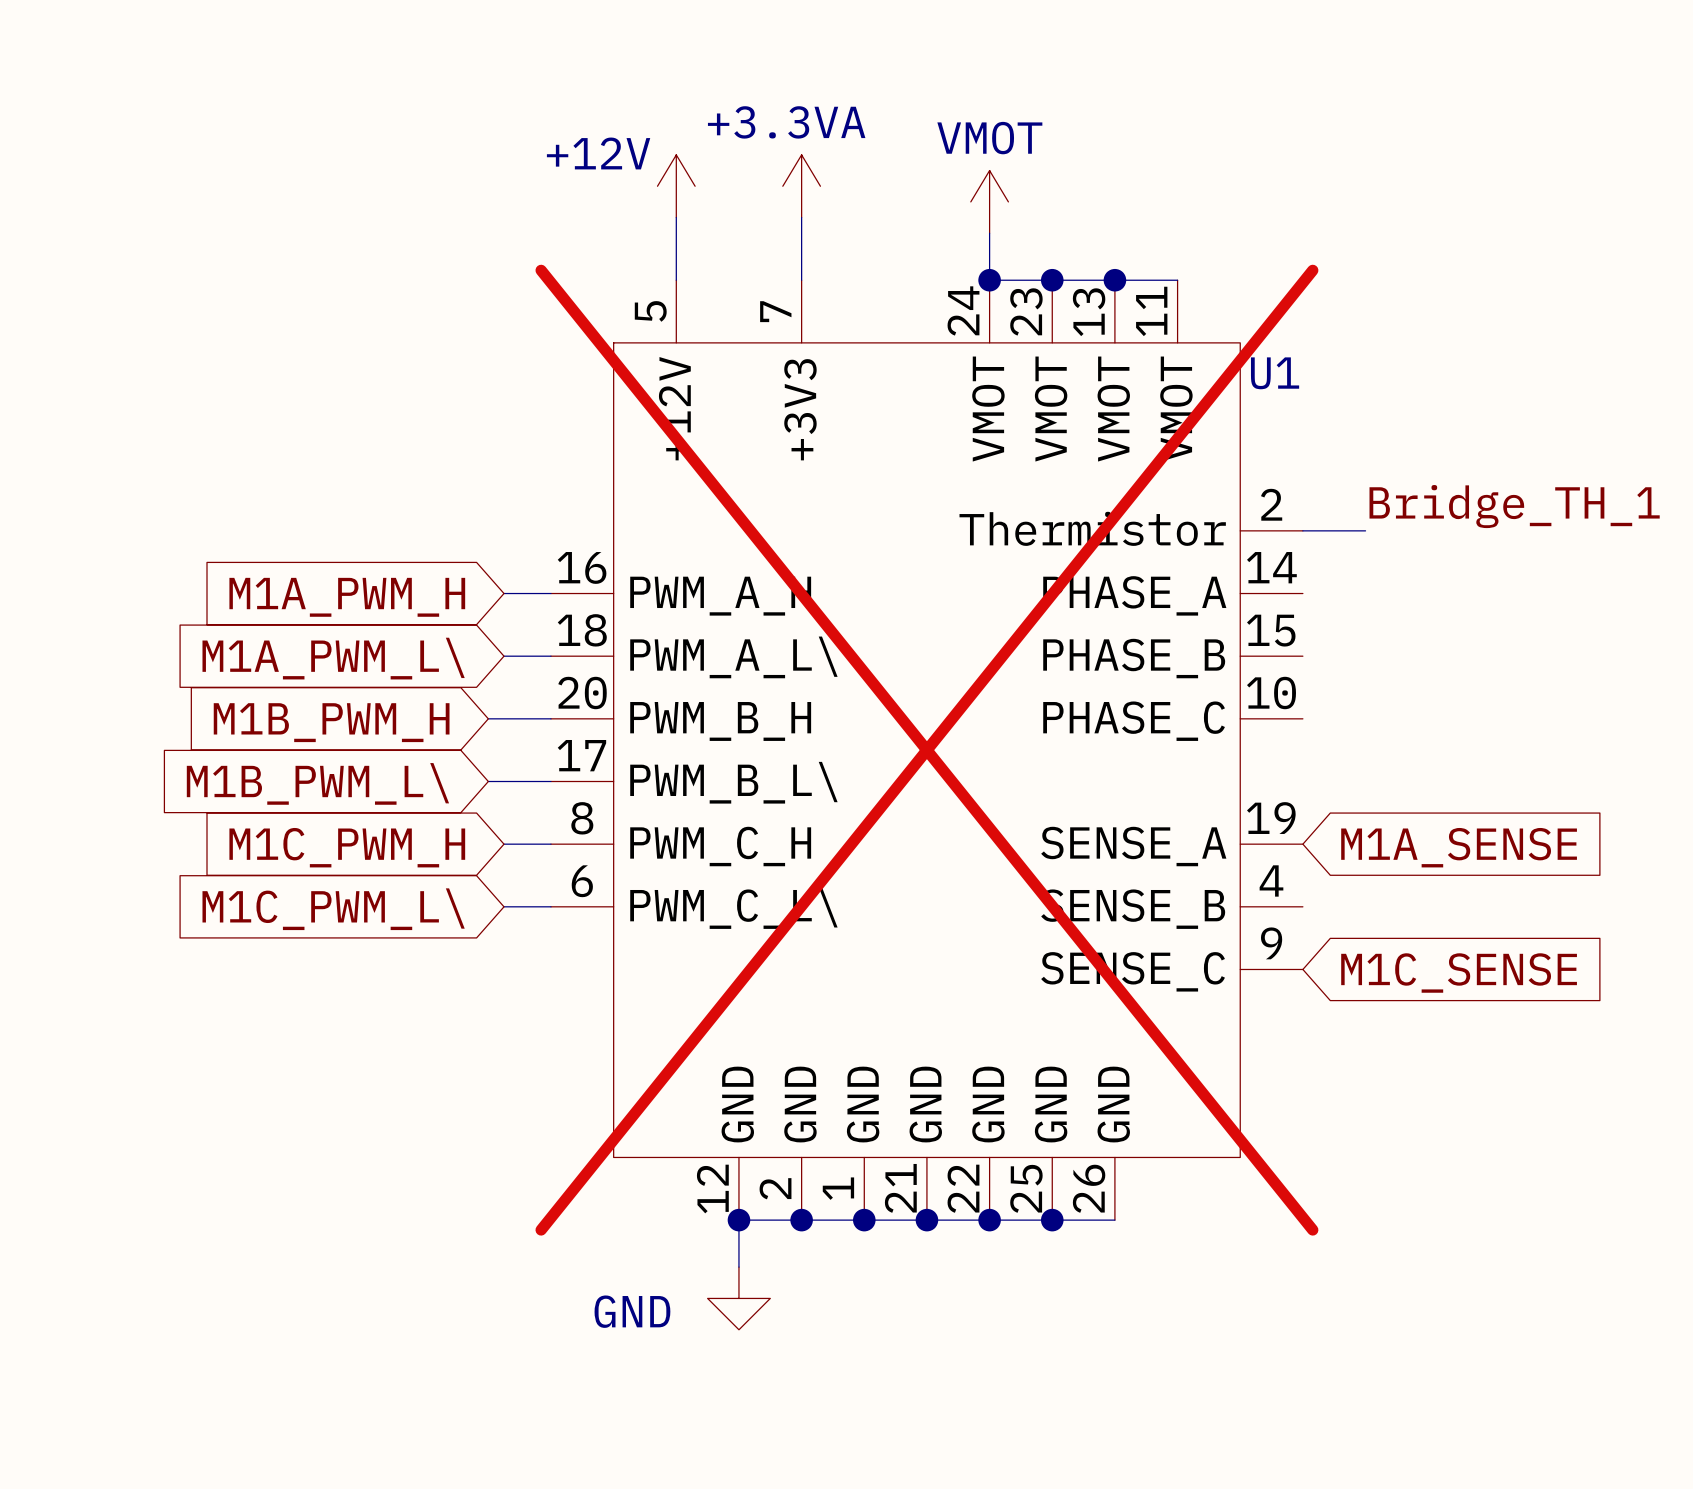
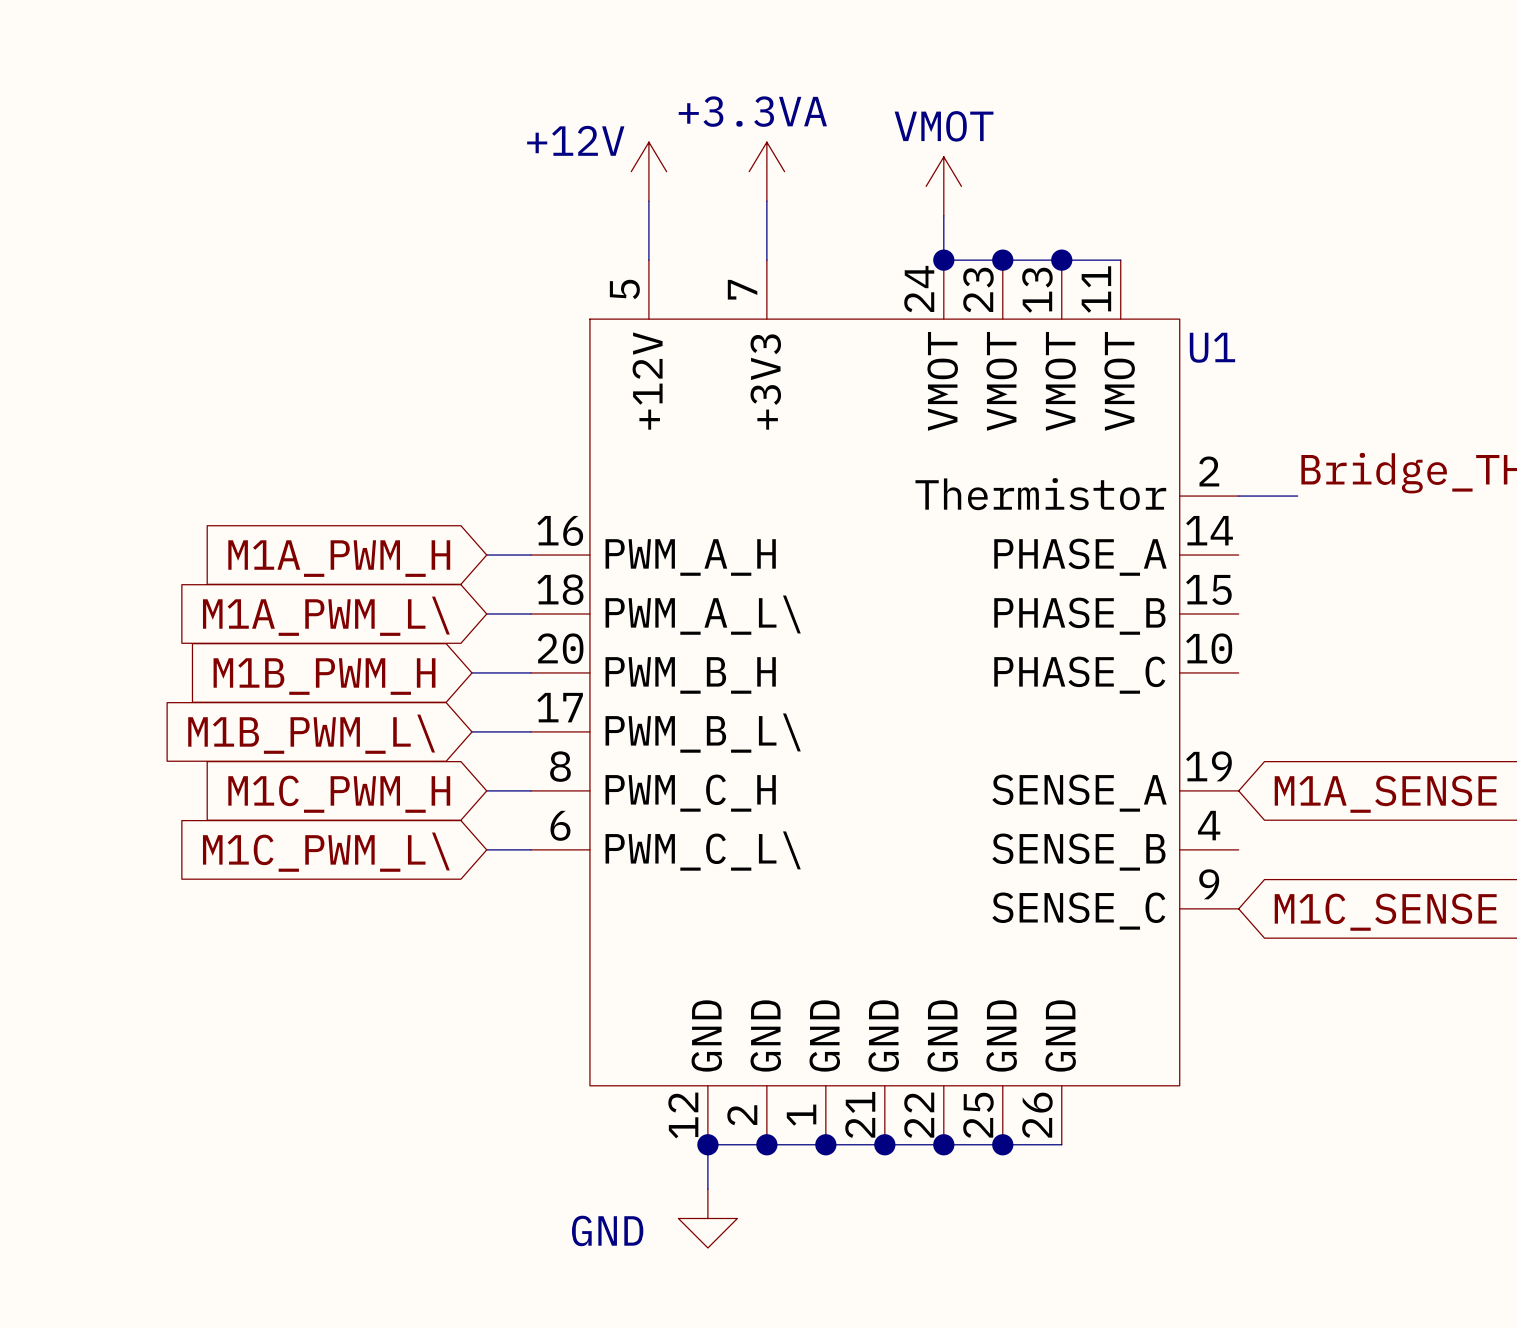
U1 do-not-place cross: (926, 750) -> none

